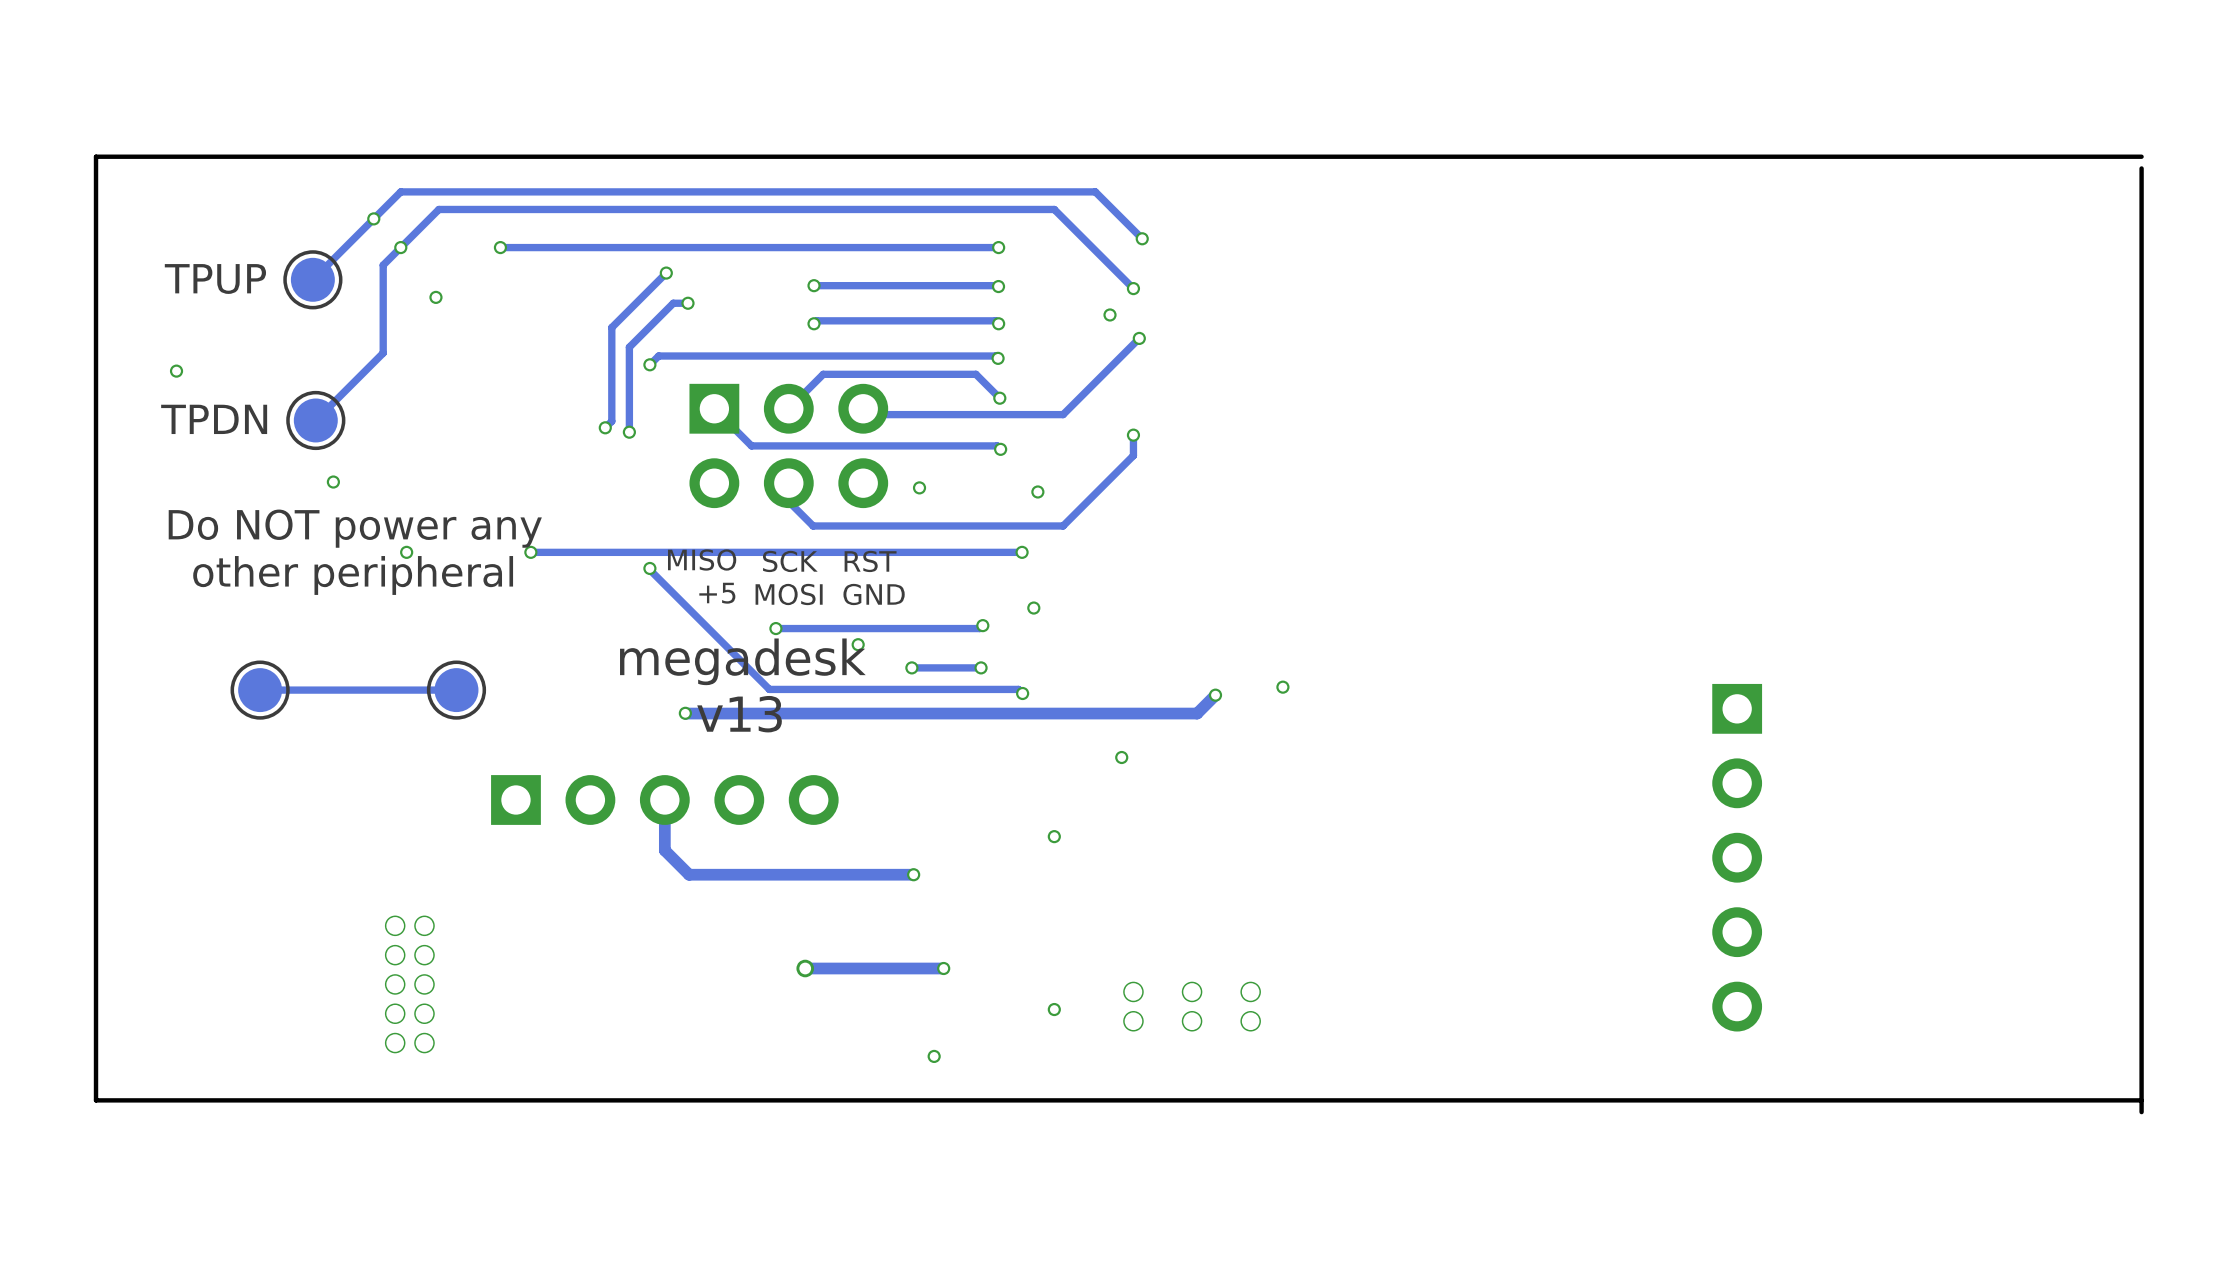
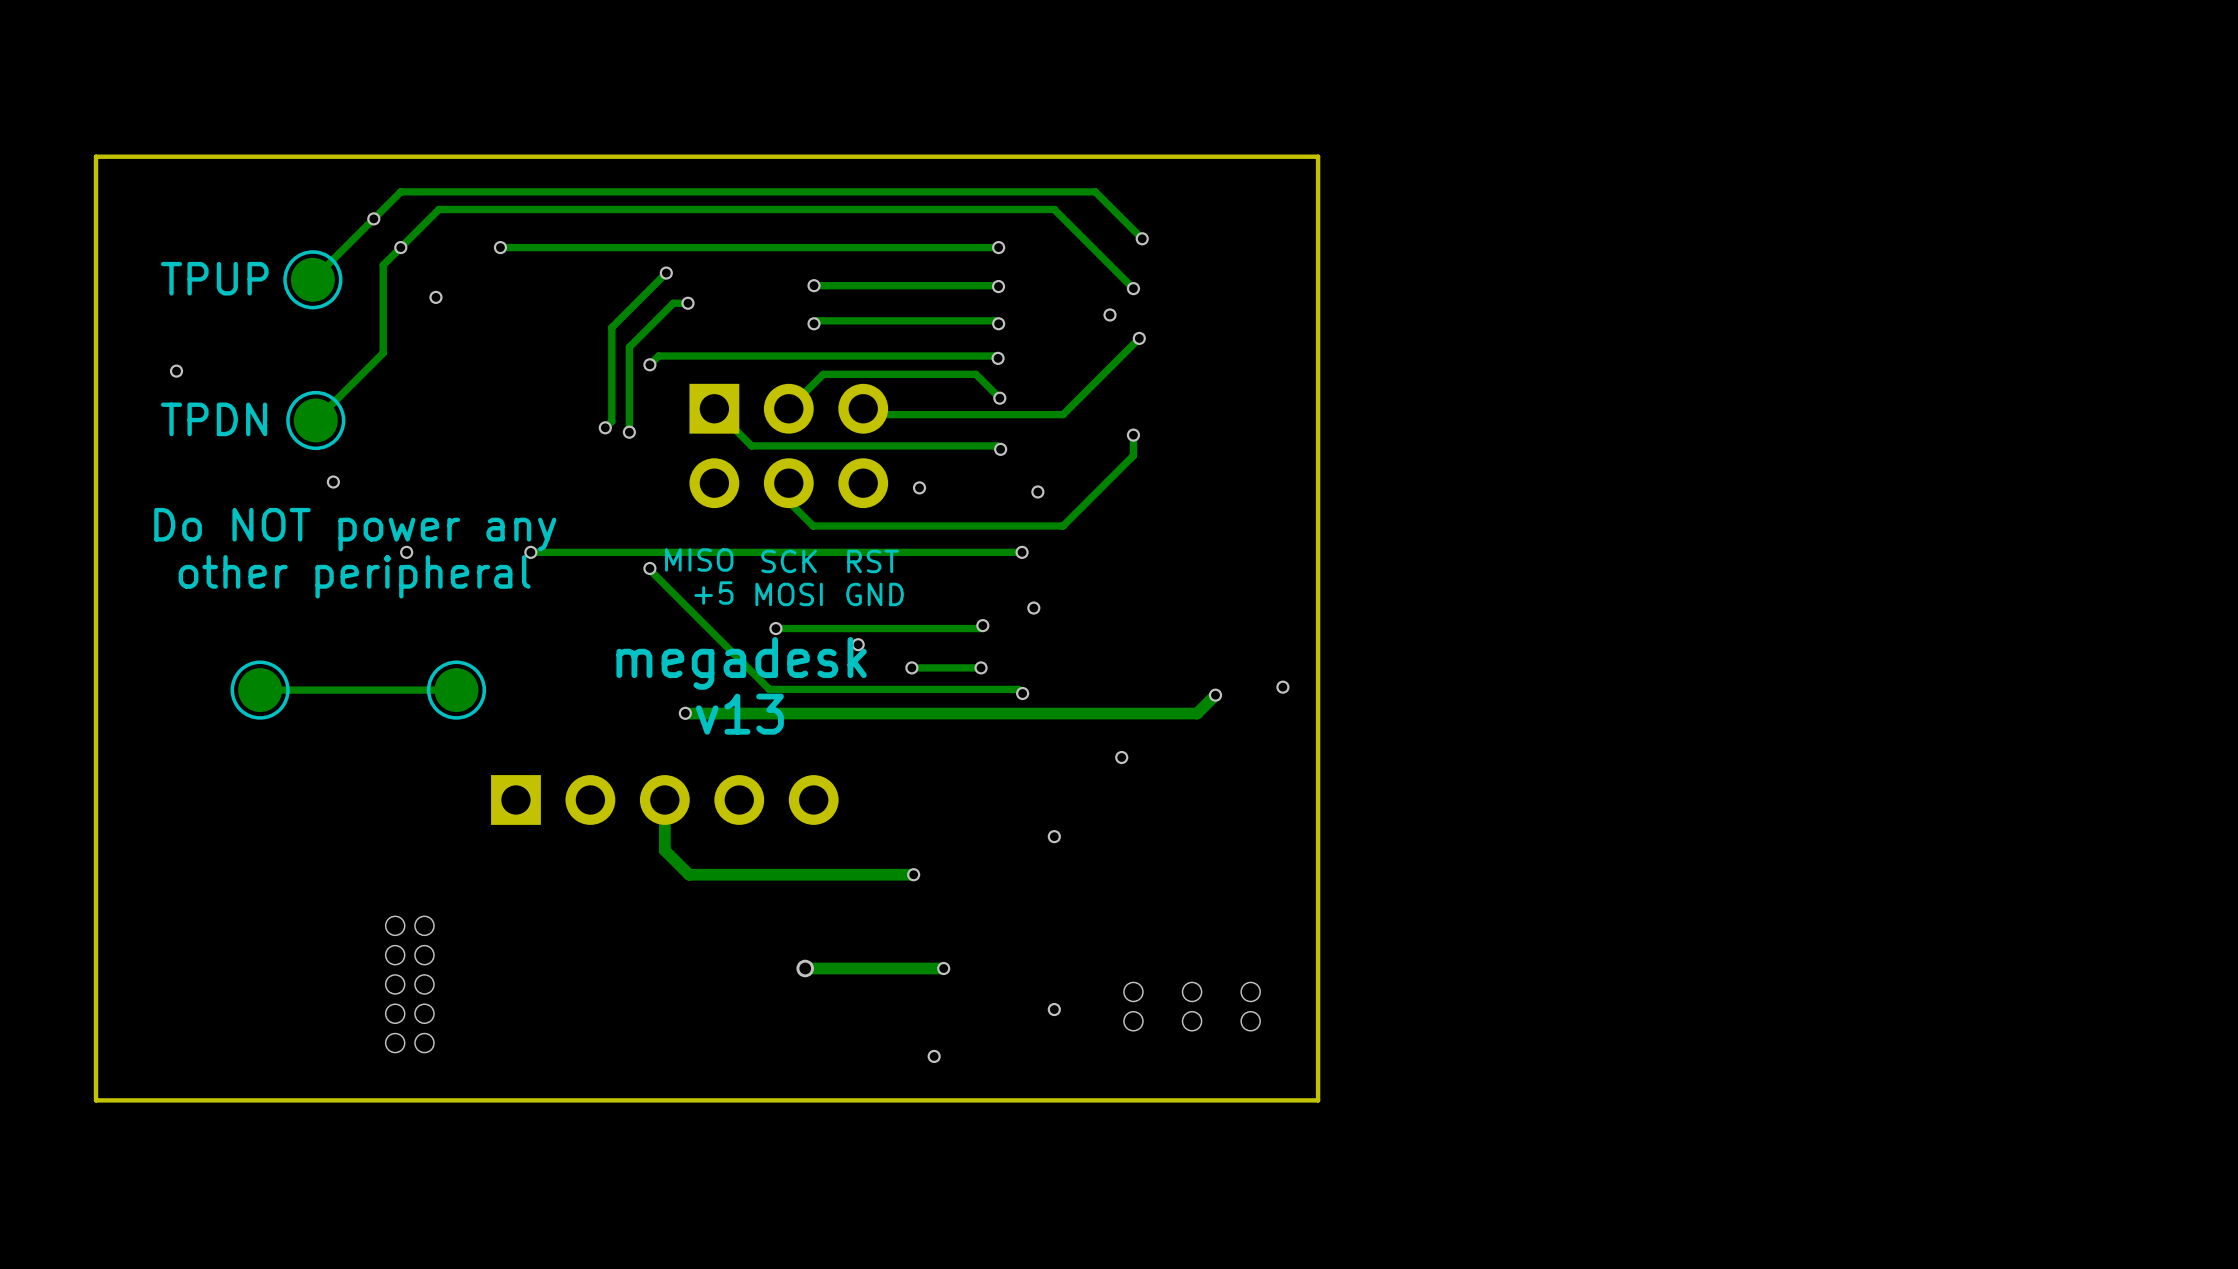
board edge: (2141, 156) (1318, 156) -> (1318, 1100) (1318, 156)
board edge: (2141, 168) (2141, 1112) -> none
part: (1737, 857) -> none
board edge: (2141, 1100) (1318, 1100) -> none

